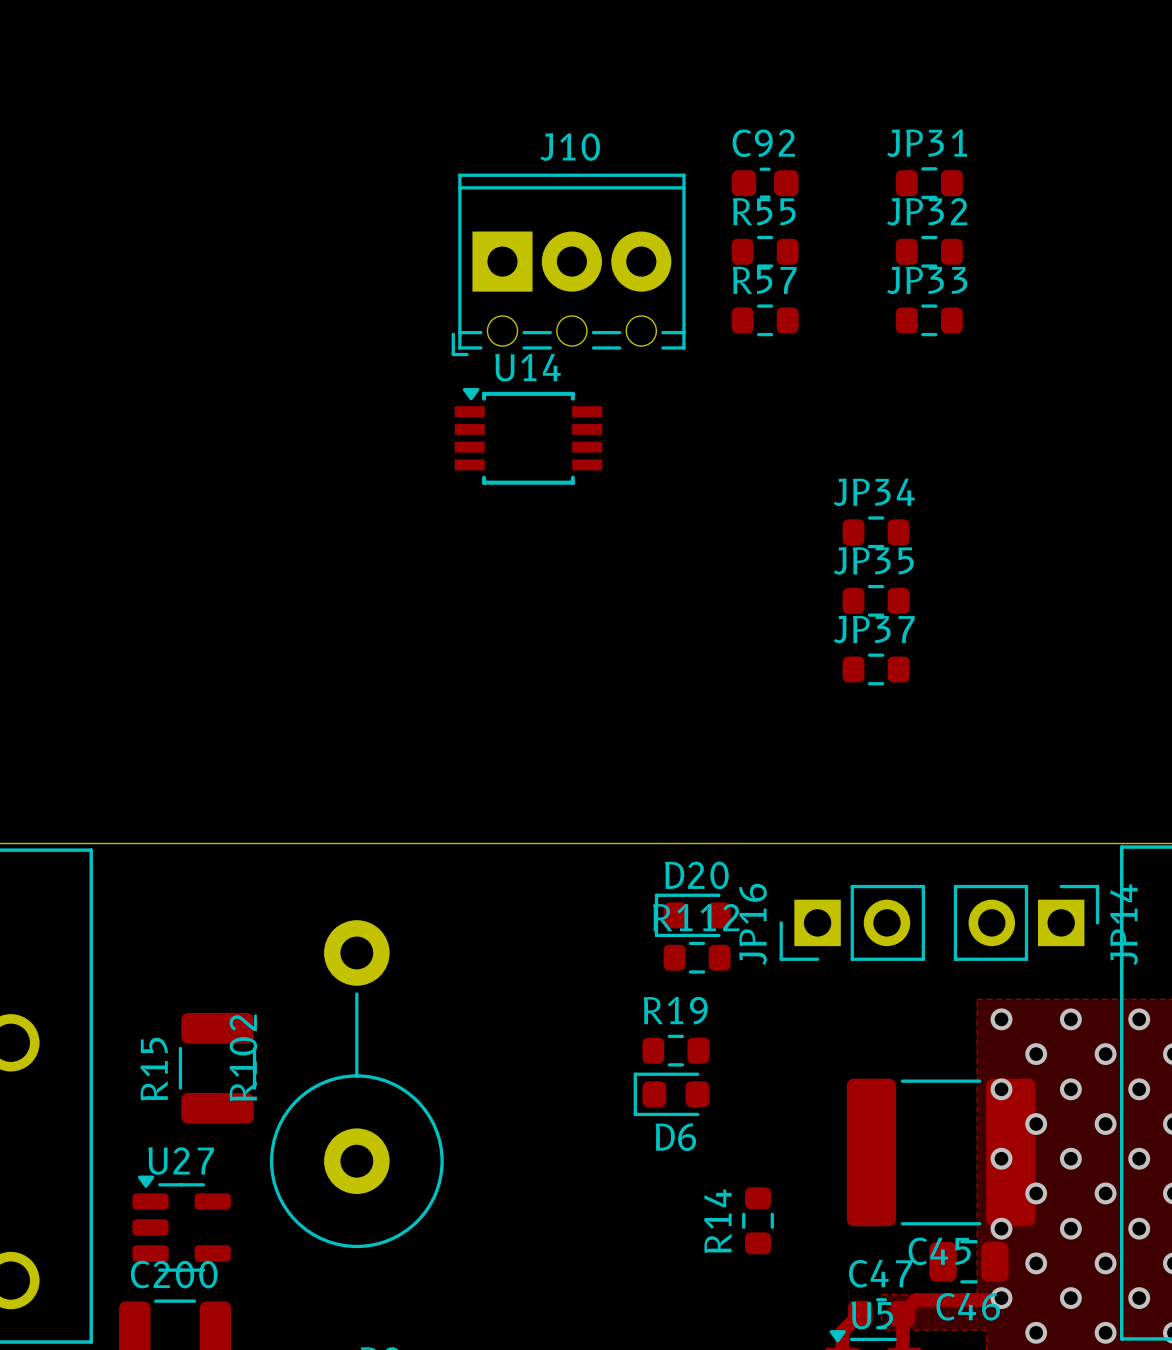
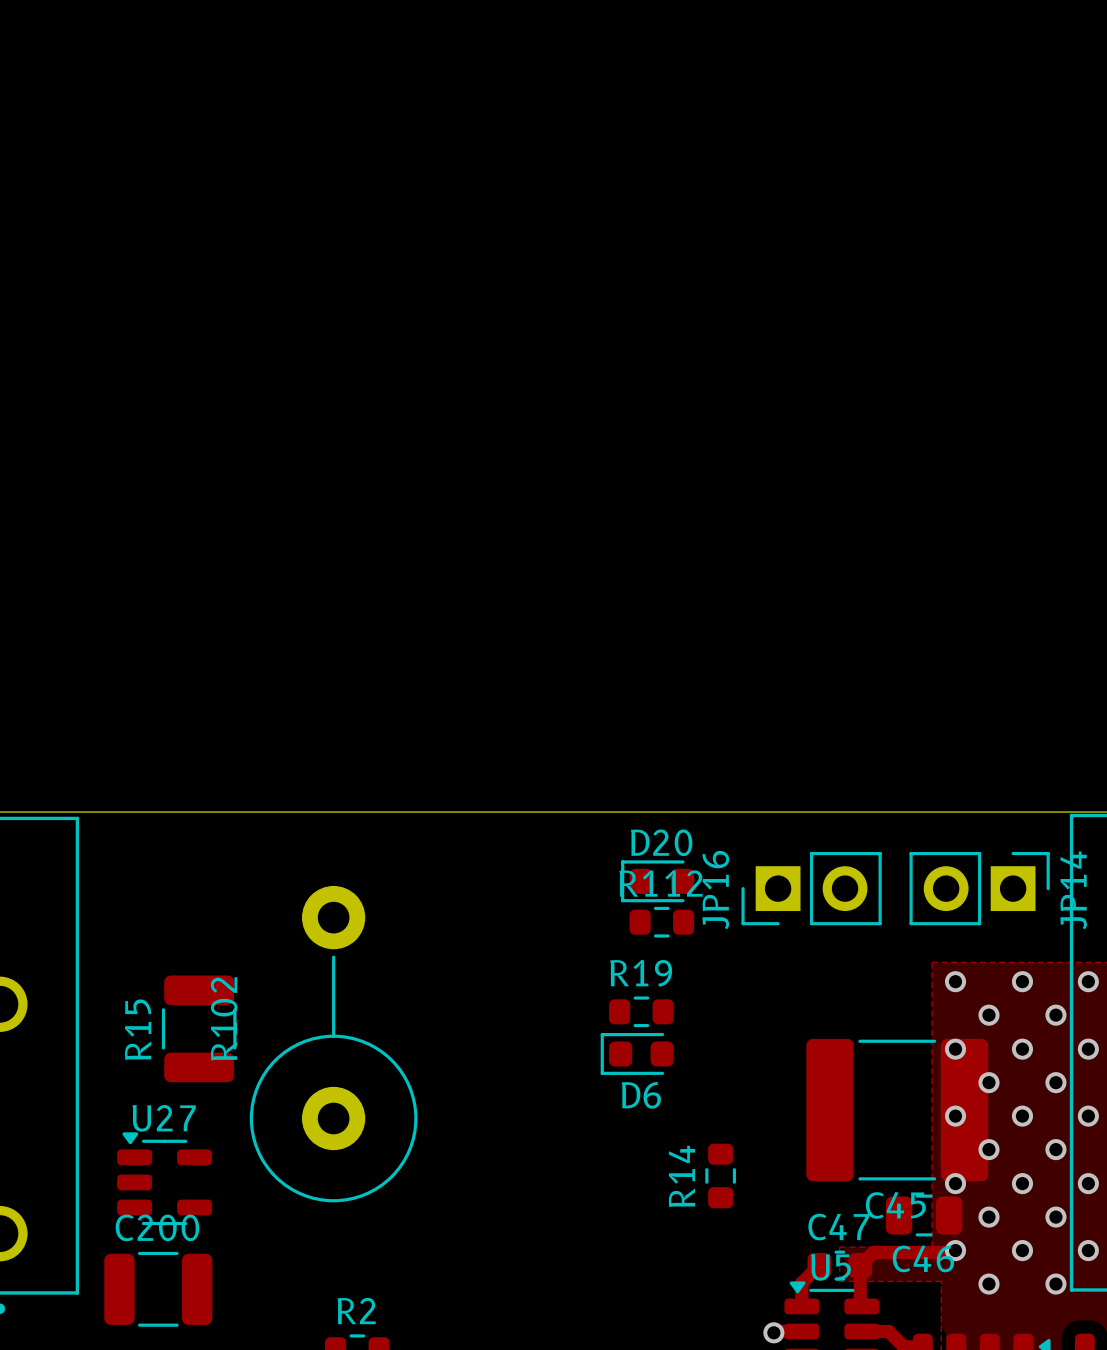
C92: (765, 183) -> none
JP31: (929, 183) -> none
R55: (765, 251) -> none
JP32: (929, 251) -> none
J10: (568, 264) -> none
R57: (765, 320) -> none
JP33: (929, 320) -> none
U14: (528, 436) -> none
JP34: (876, 532) -> none
JP35: (876, 600) -> none
JP37: (876, 669) -> none

